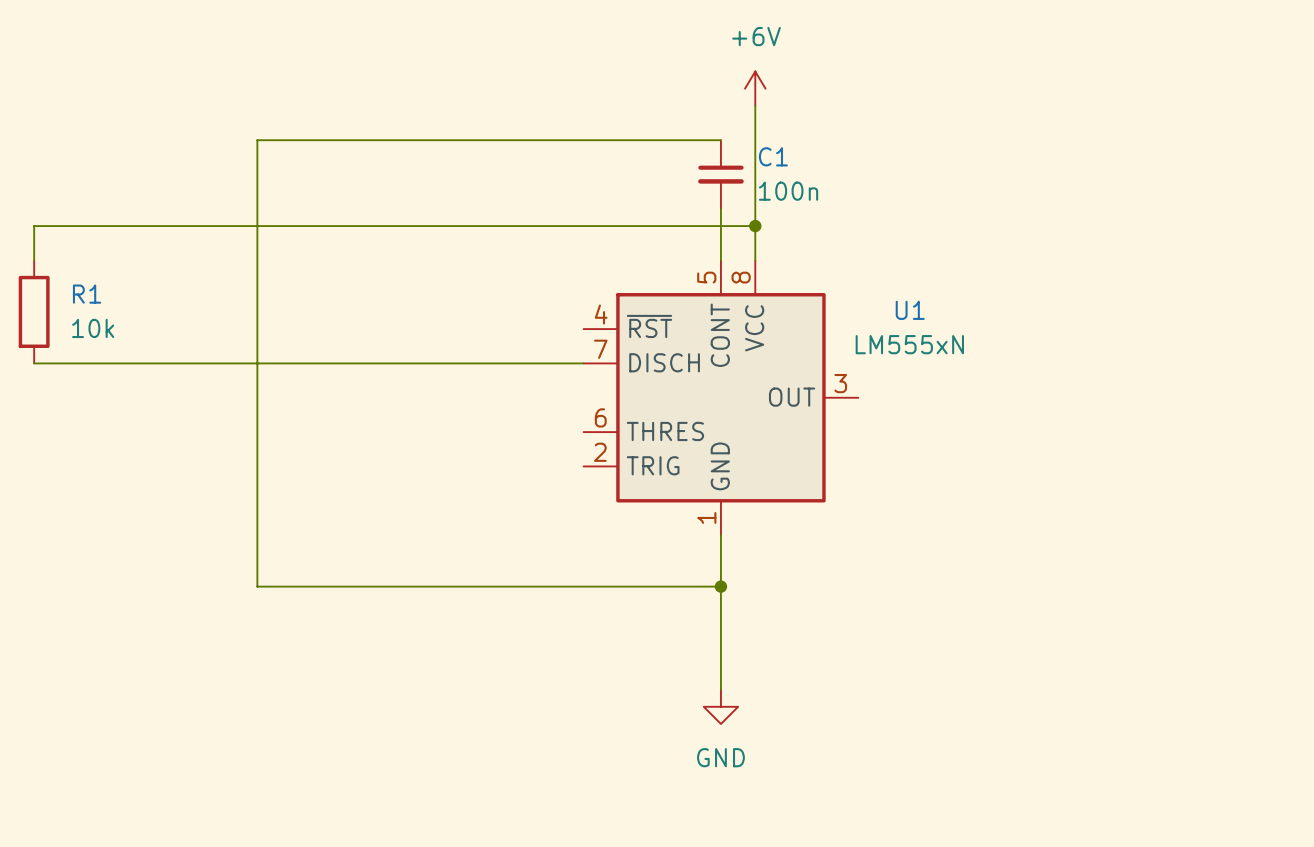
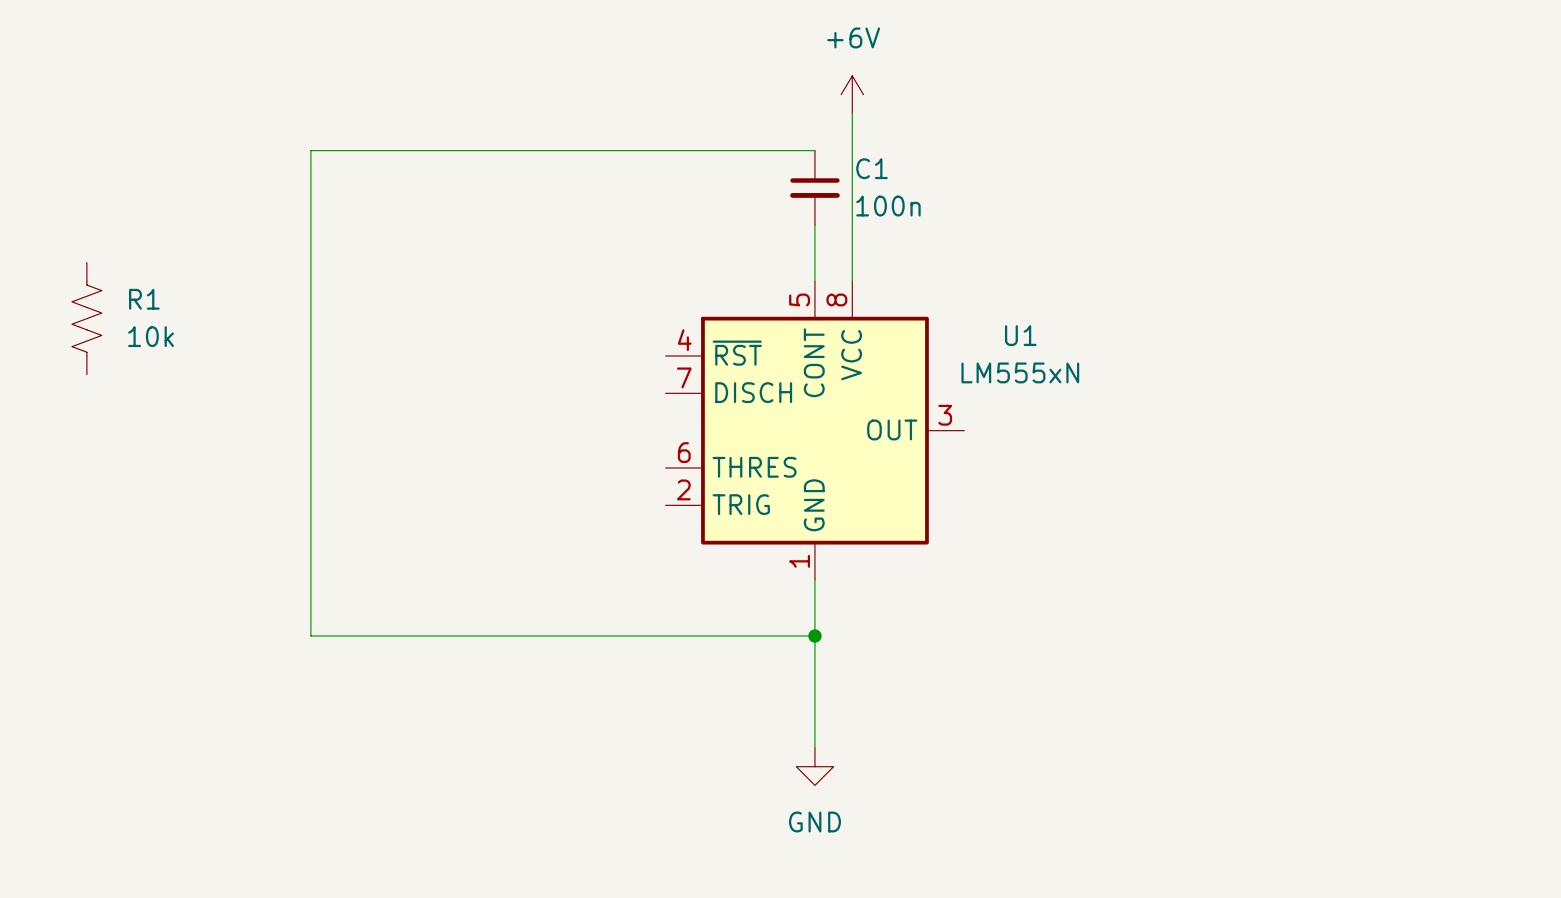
wire: (755, 226) (34, 226) (34, 260) -> none
junction: (755, 226) -> none
R1 symbol: [18, 260, 50, 364] -> [71, 262, 102, 375]
wire: (34, 363) (583, 363) -> none

